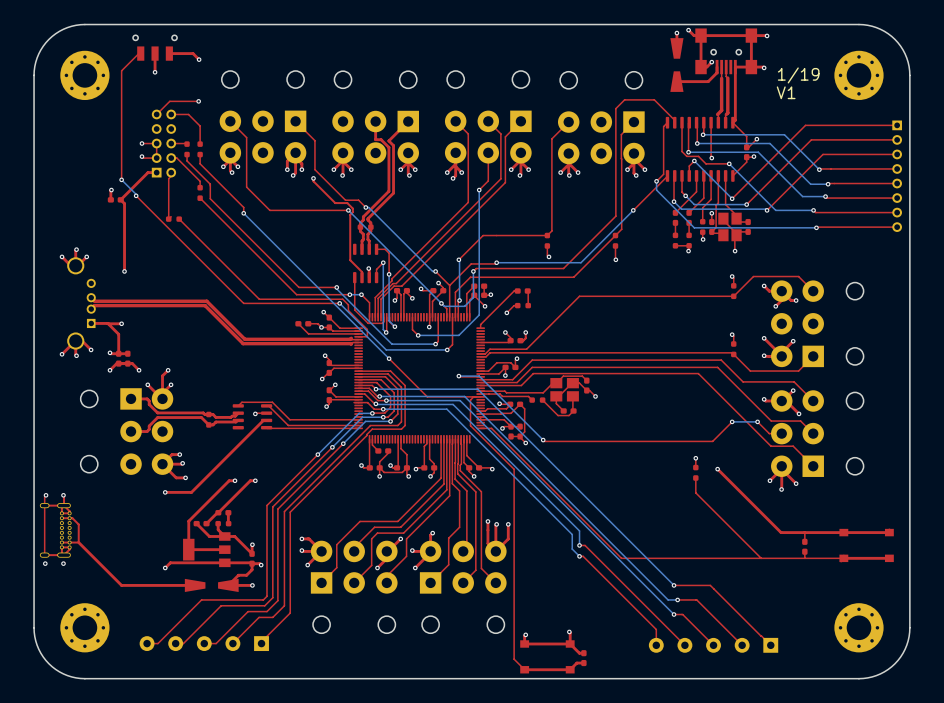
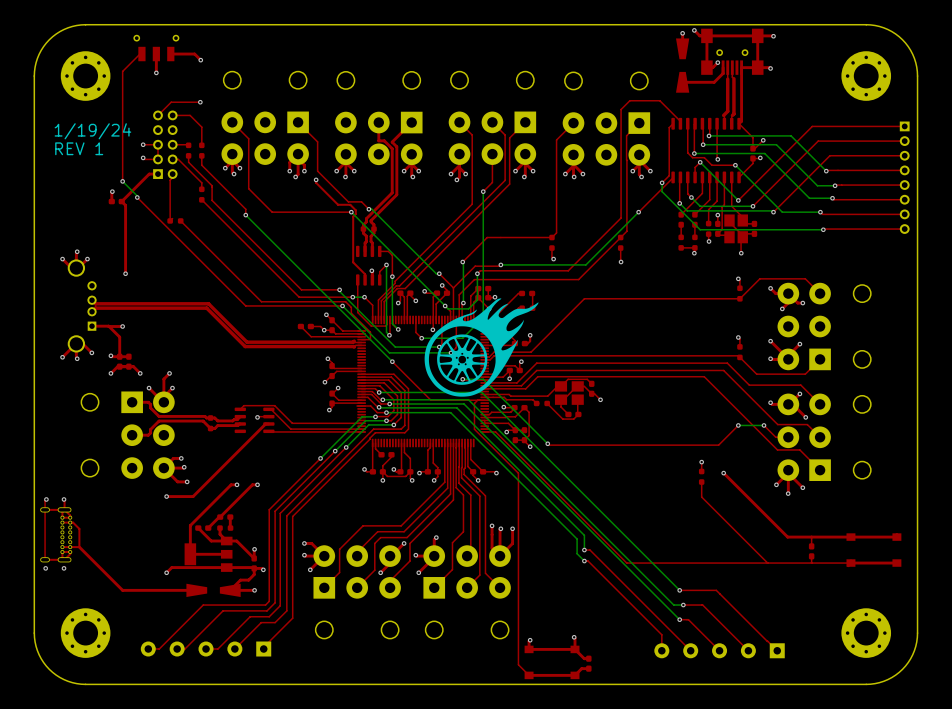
text: 1/19 (798, 75) -> none
text: V1 (786, 92) -> none
text: none -> 1/19/24 (92, 131)
text: none -> REV 1 (79, 148)
drawing: none -> [424, 298, 539, 397]

